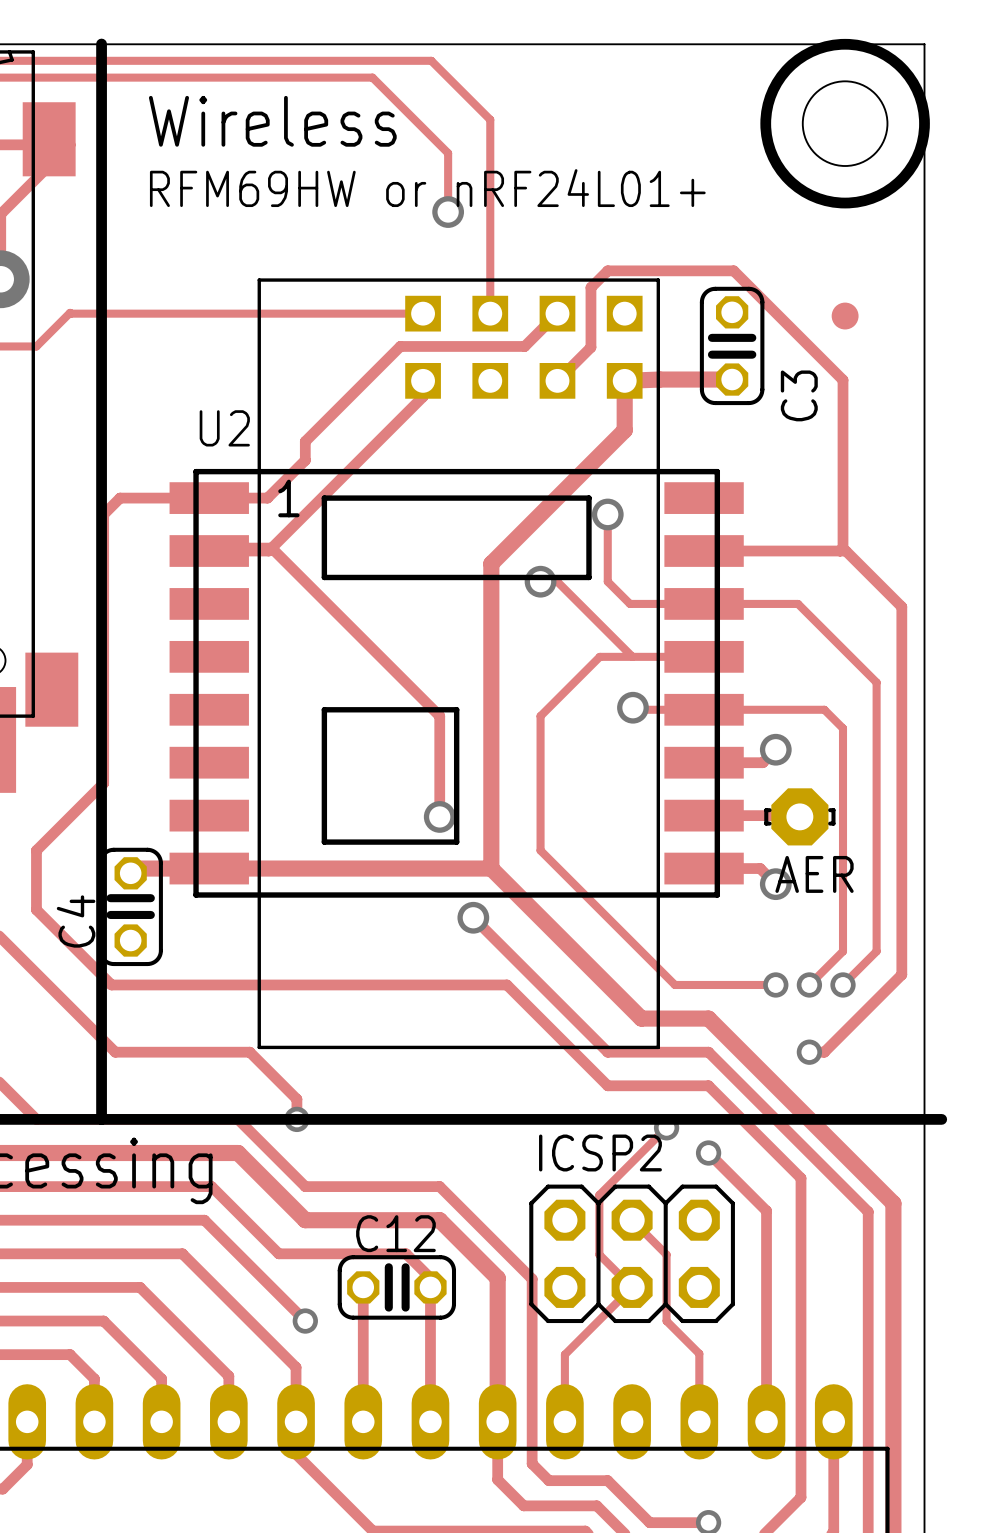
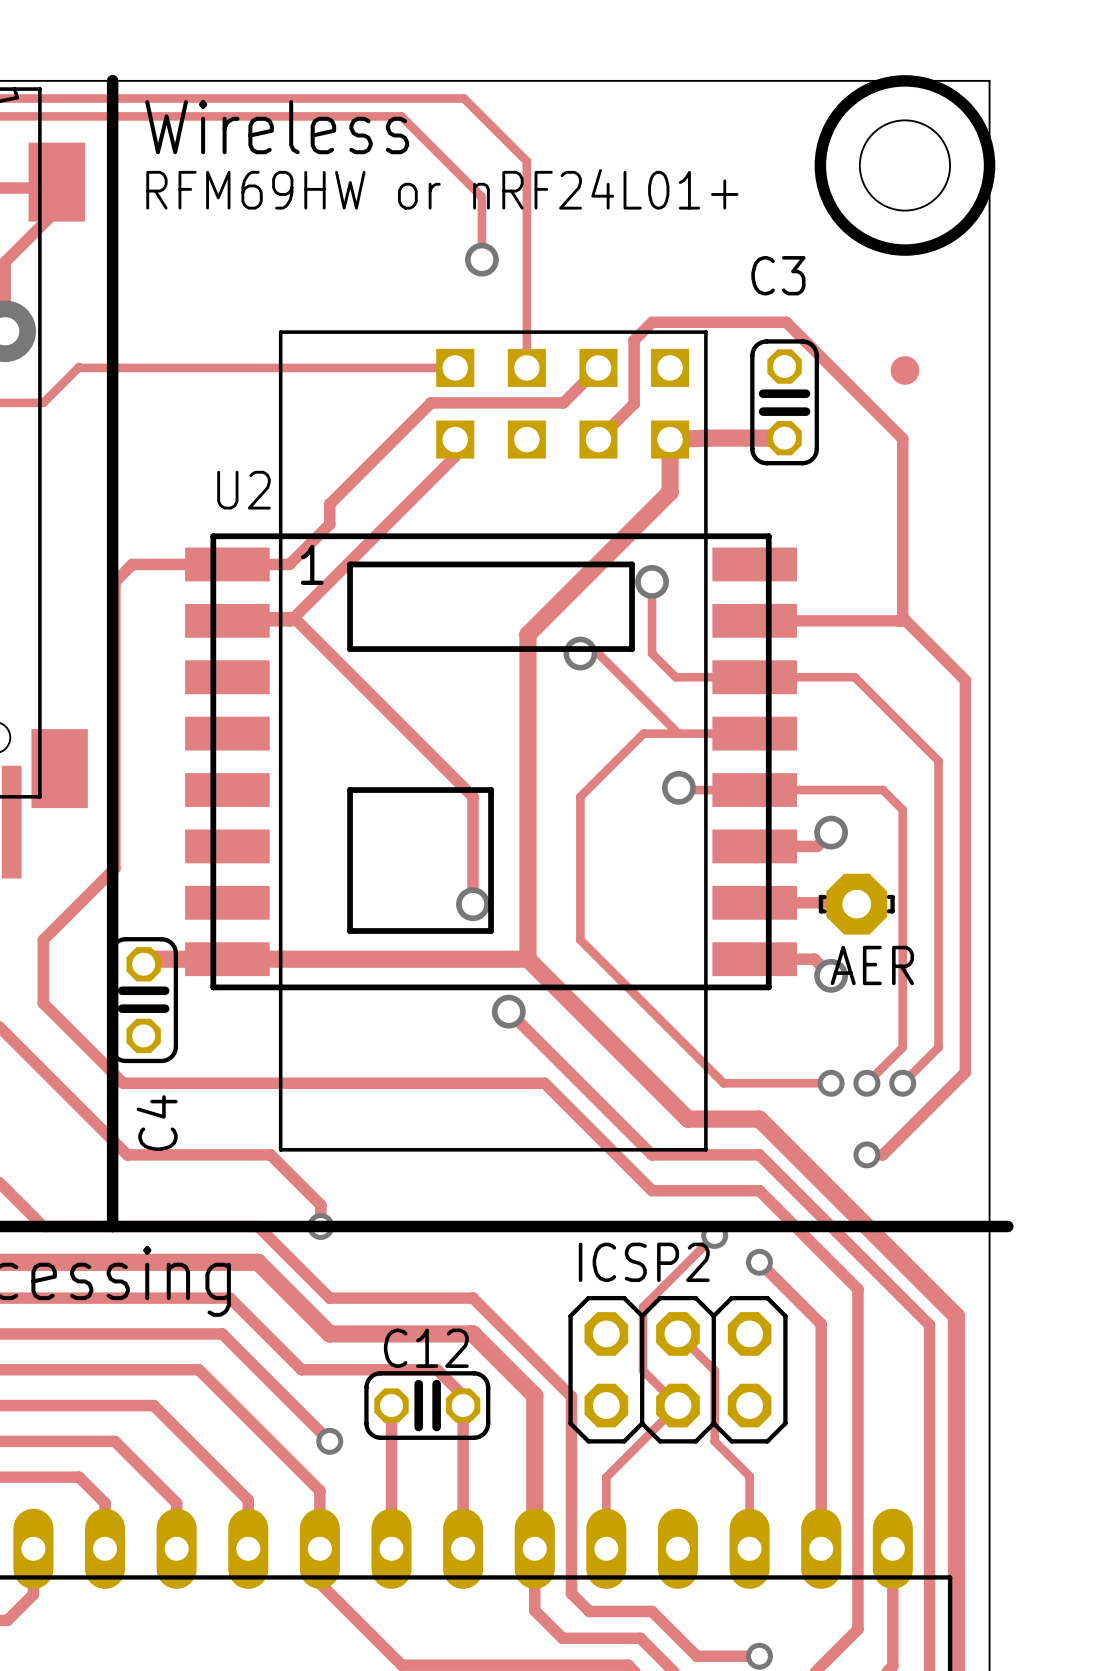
text position: Wireless (272, 121) -> Wireless (277, 127)
text position: RFM69HW or nRF24L01+ (427, 188) -> RFM69HW or nRF24L01+ (442, 189)
C3 name rotation: 0° (799, 395) -> 90° clockwise (778, 275)
C3 name position: C3 (799, 395) -> C3 (778, 275)
C4 name position: C4 (76, 921) -> C4 (157, 1123)

